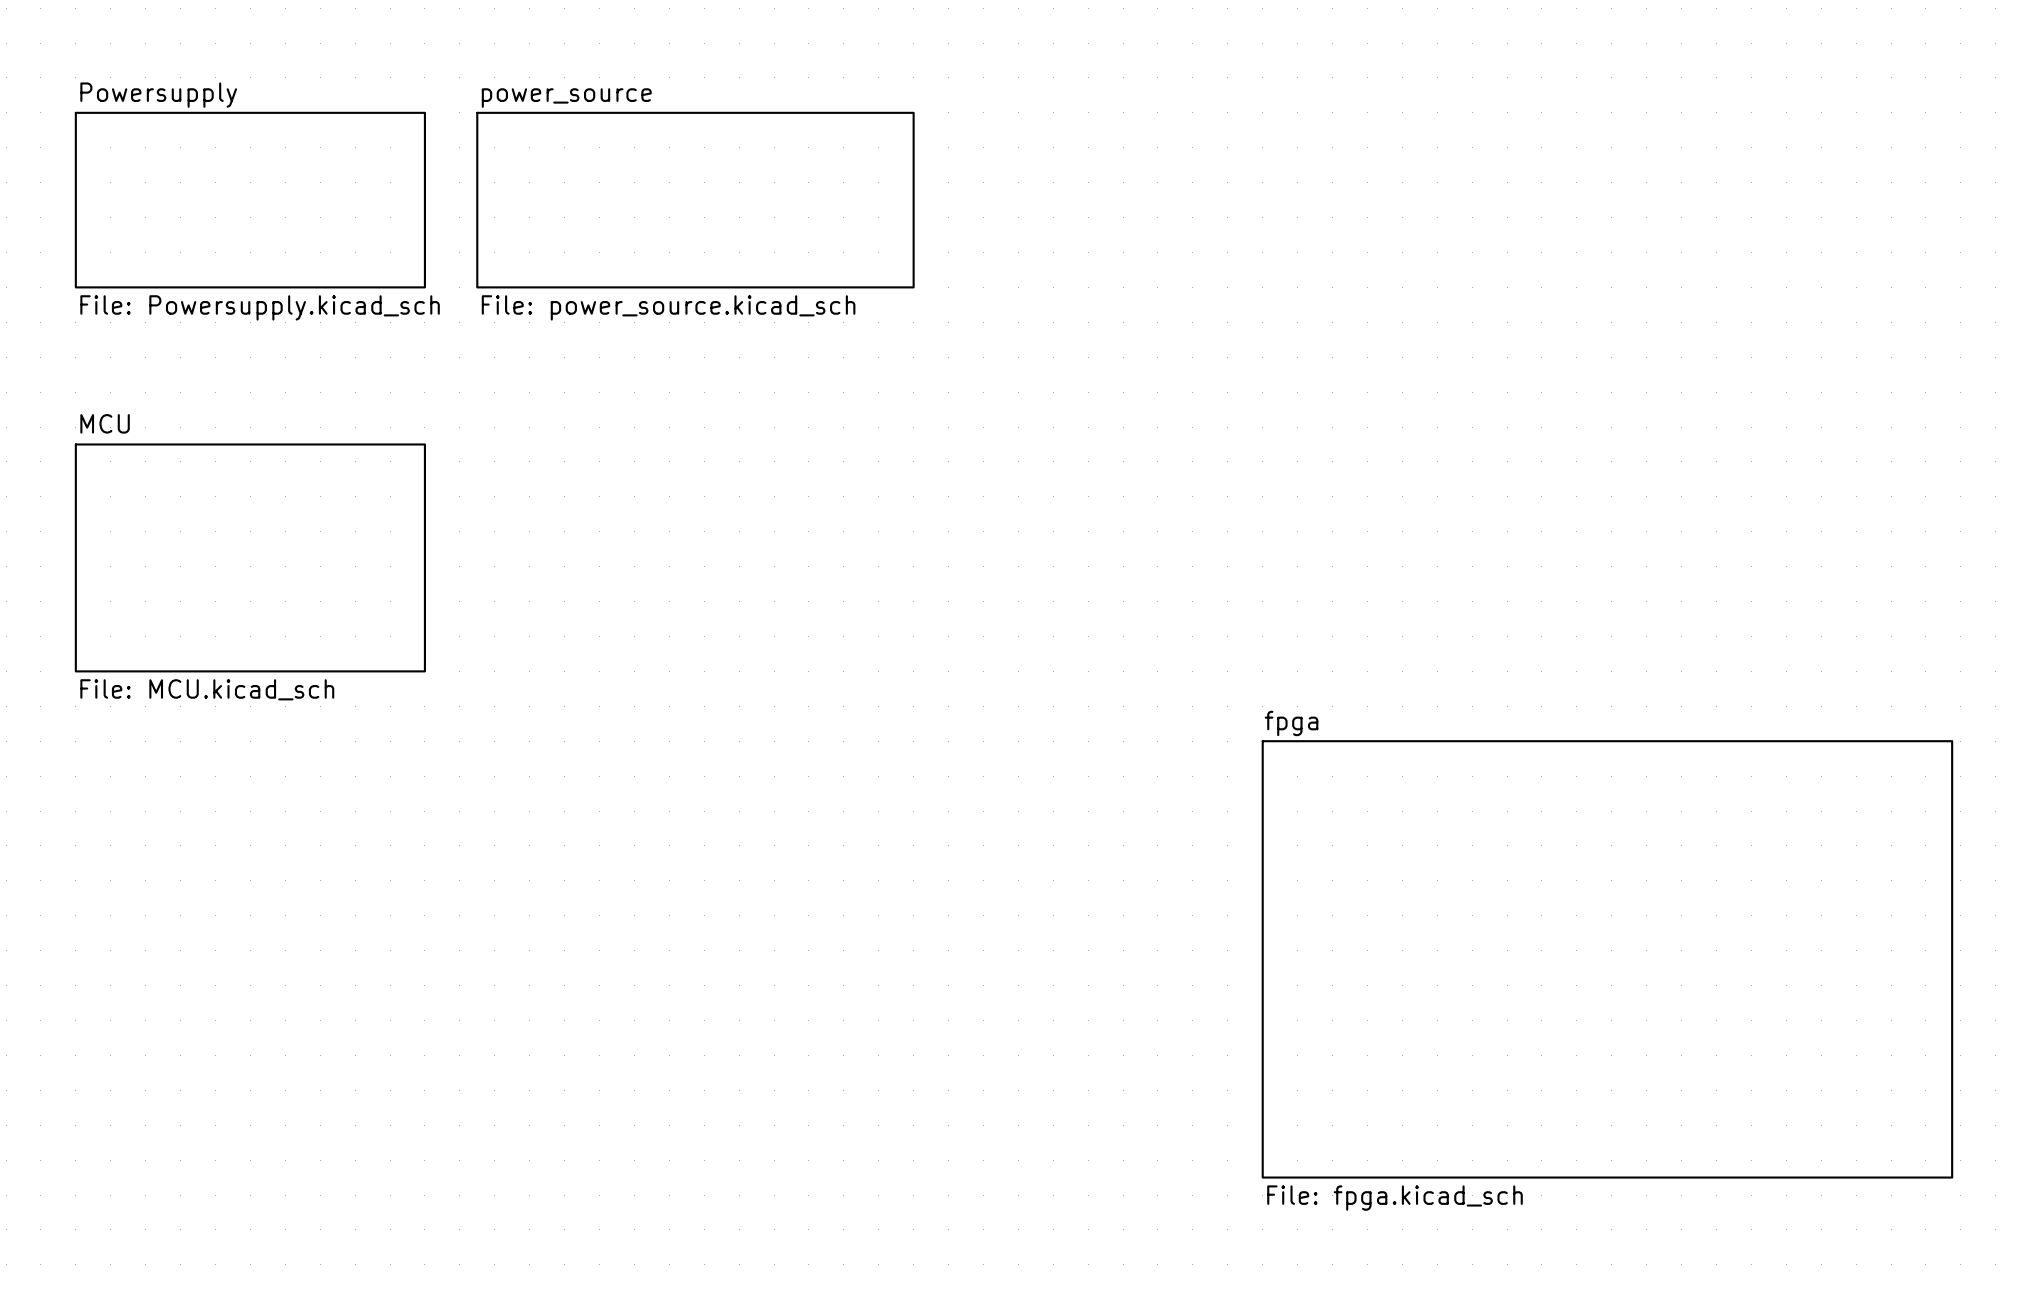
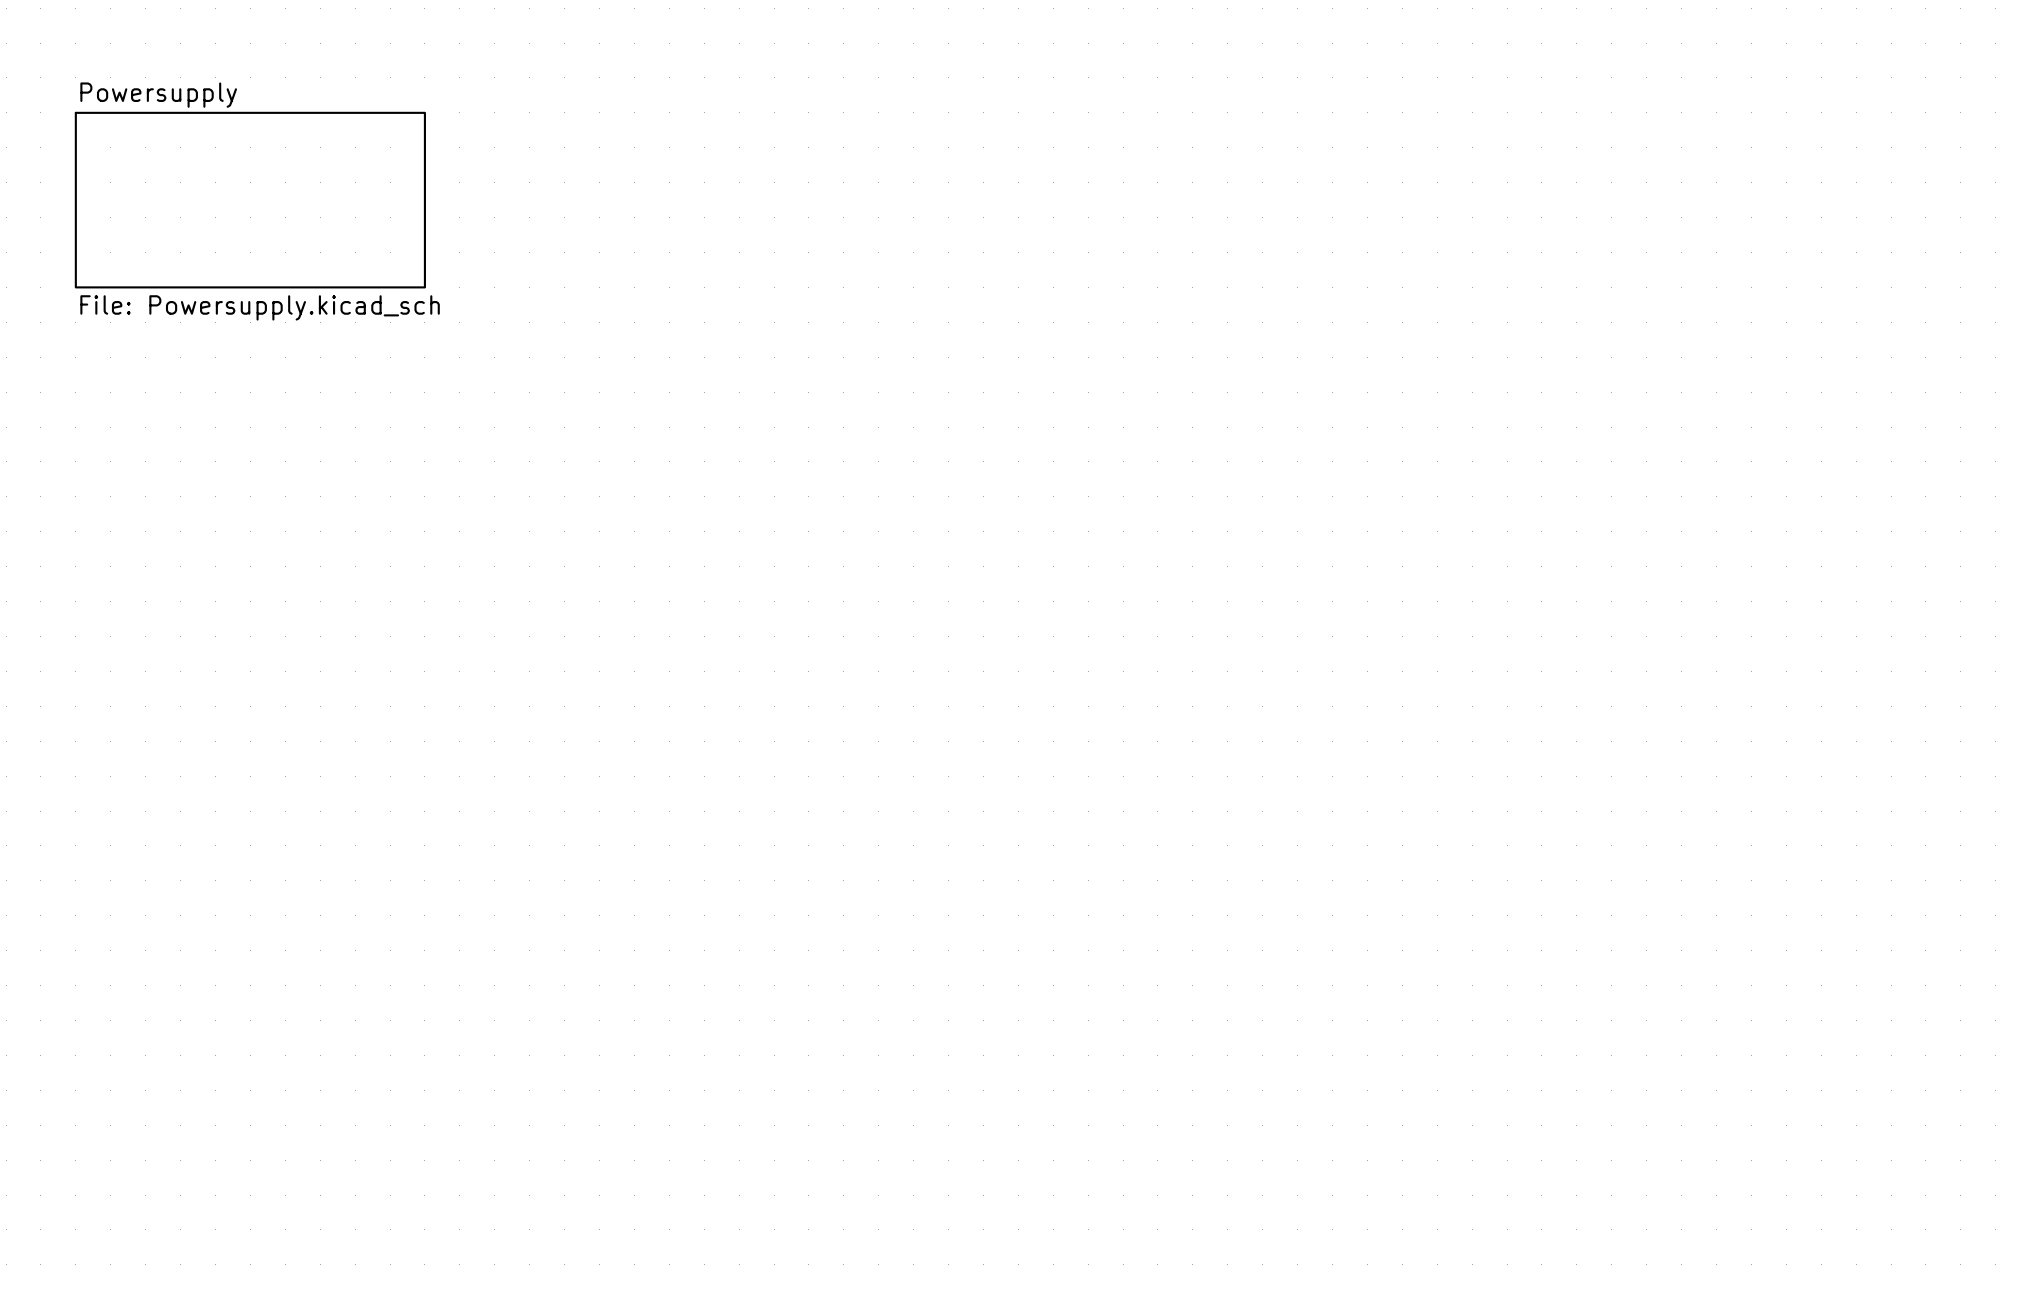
sheet power_source: File: power_source.kicad_sch (695, 200) -> none
sheet MCU: File: MCU.kicad_sch (250, 557) -> none
sheet fpga: File: fpga.kicad_sch (1607, 959) -> none

